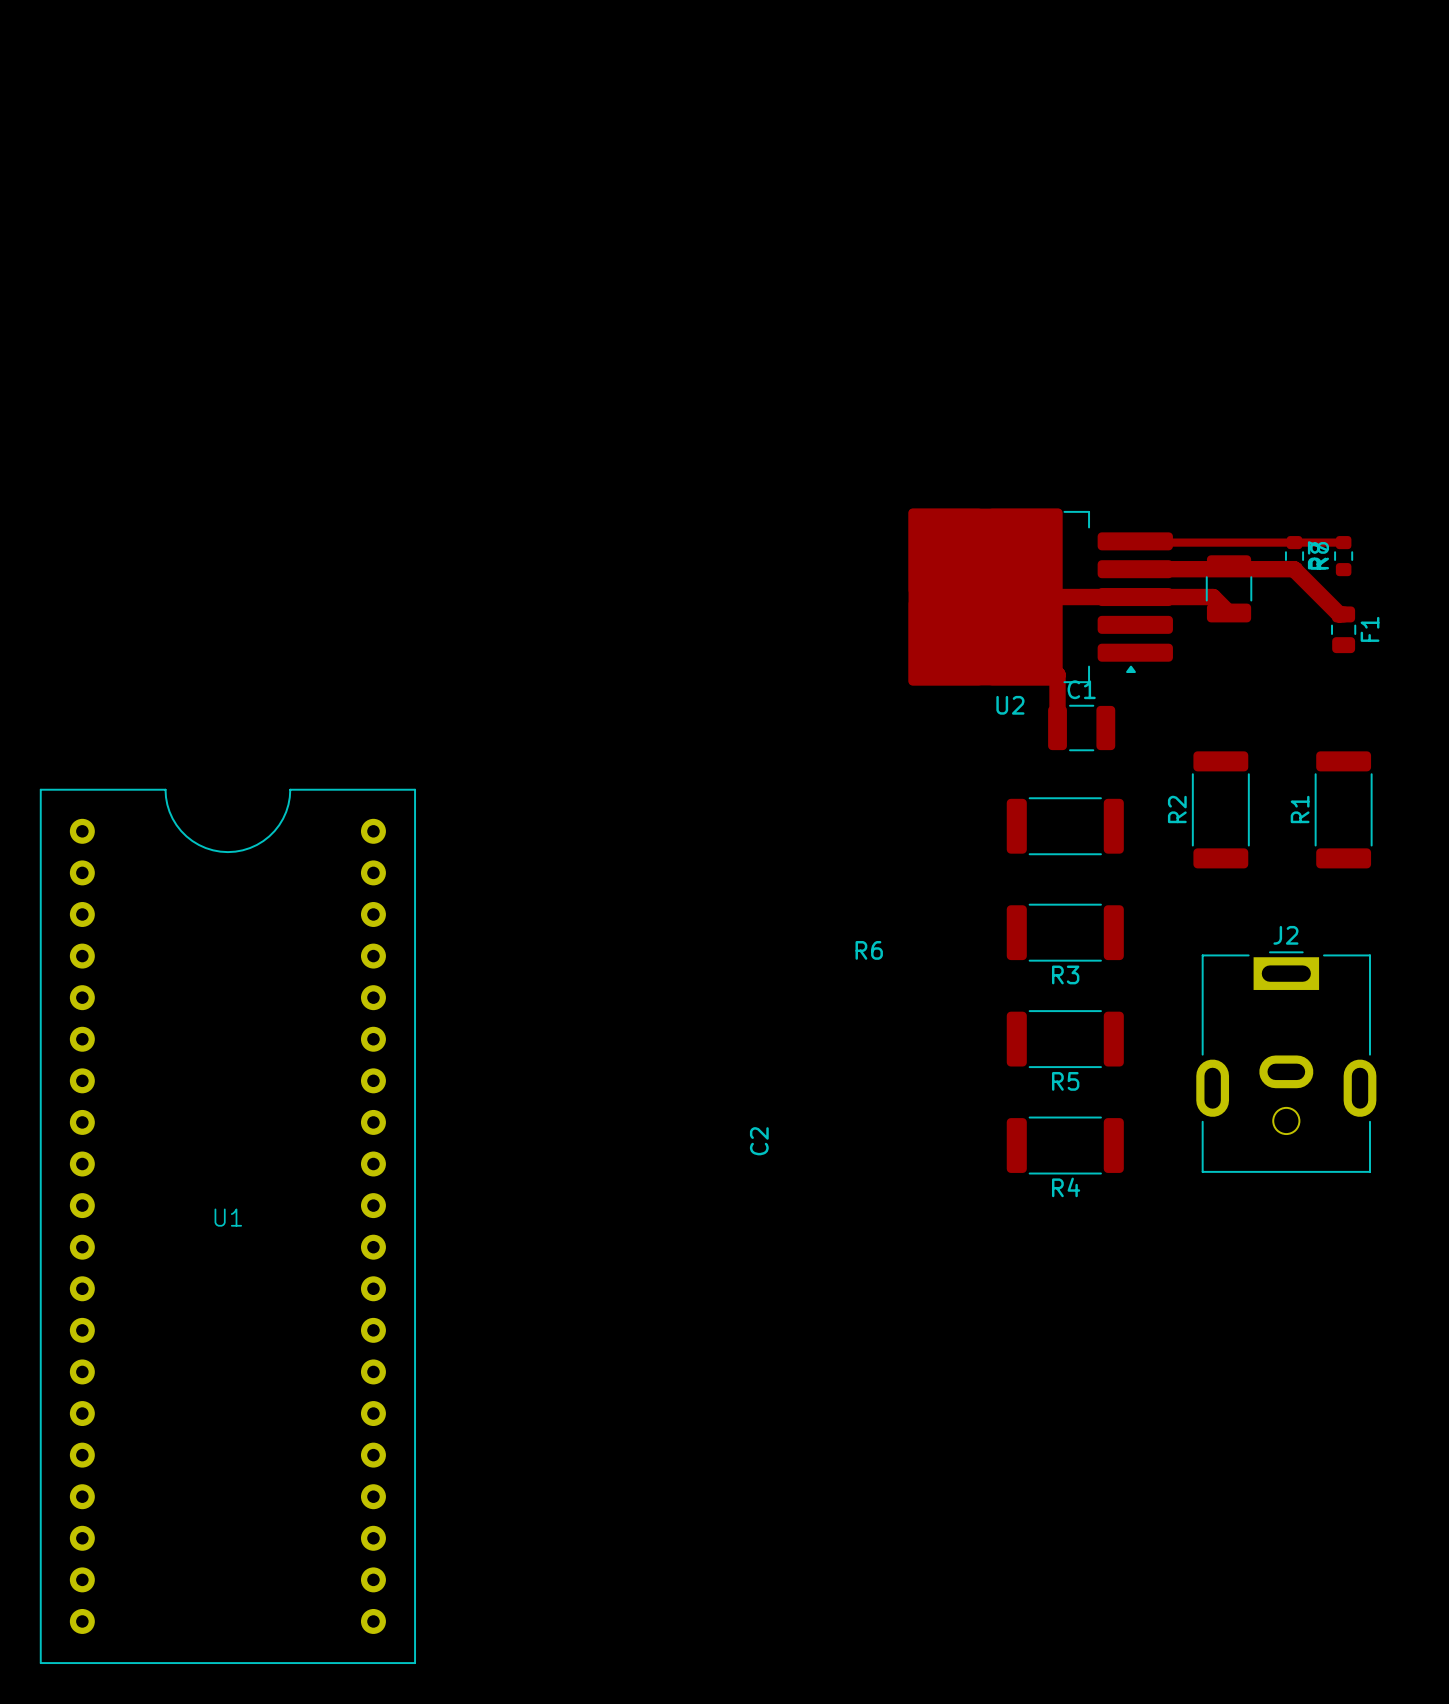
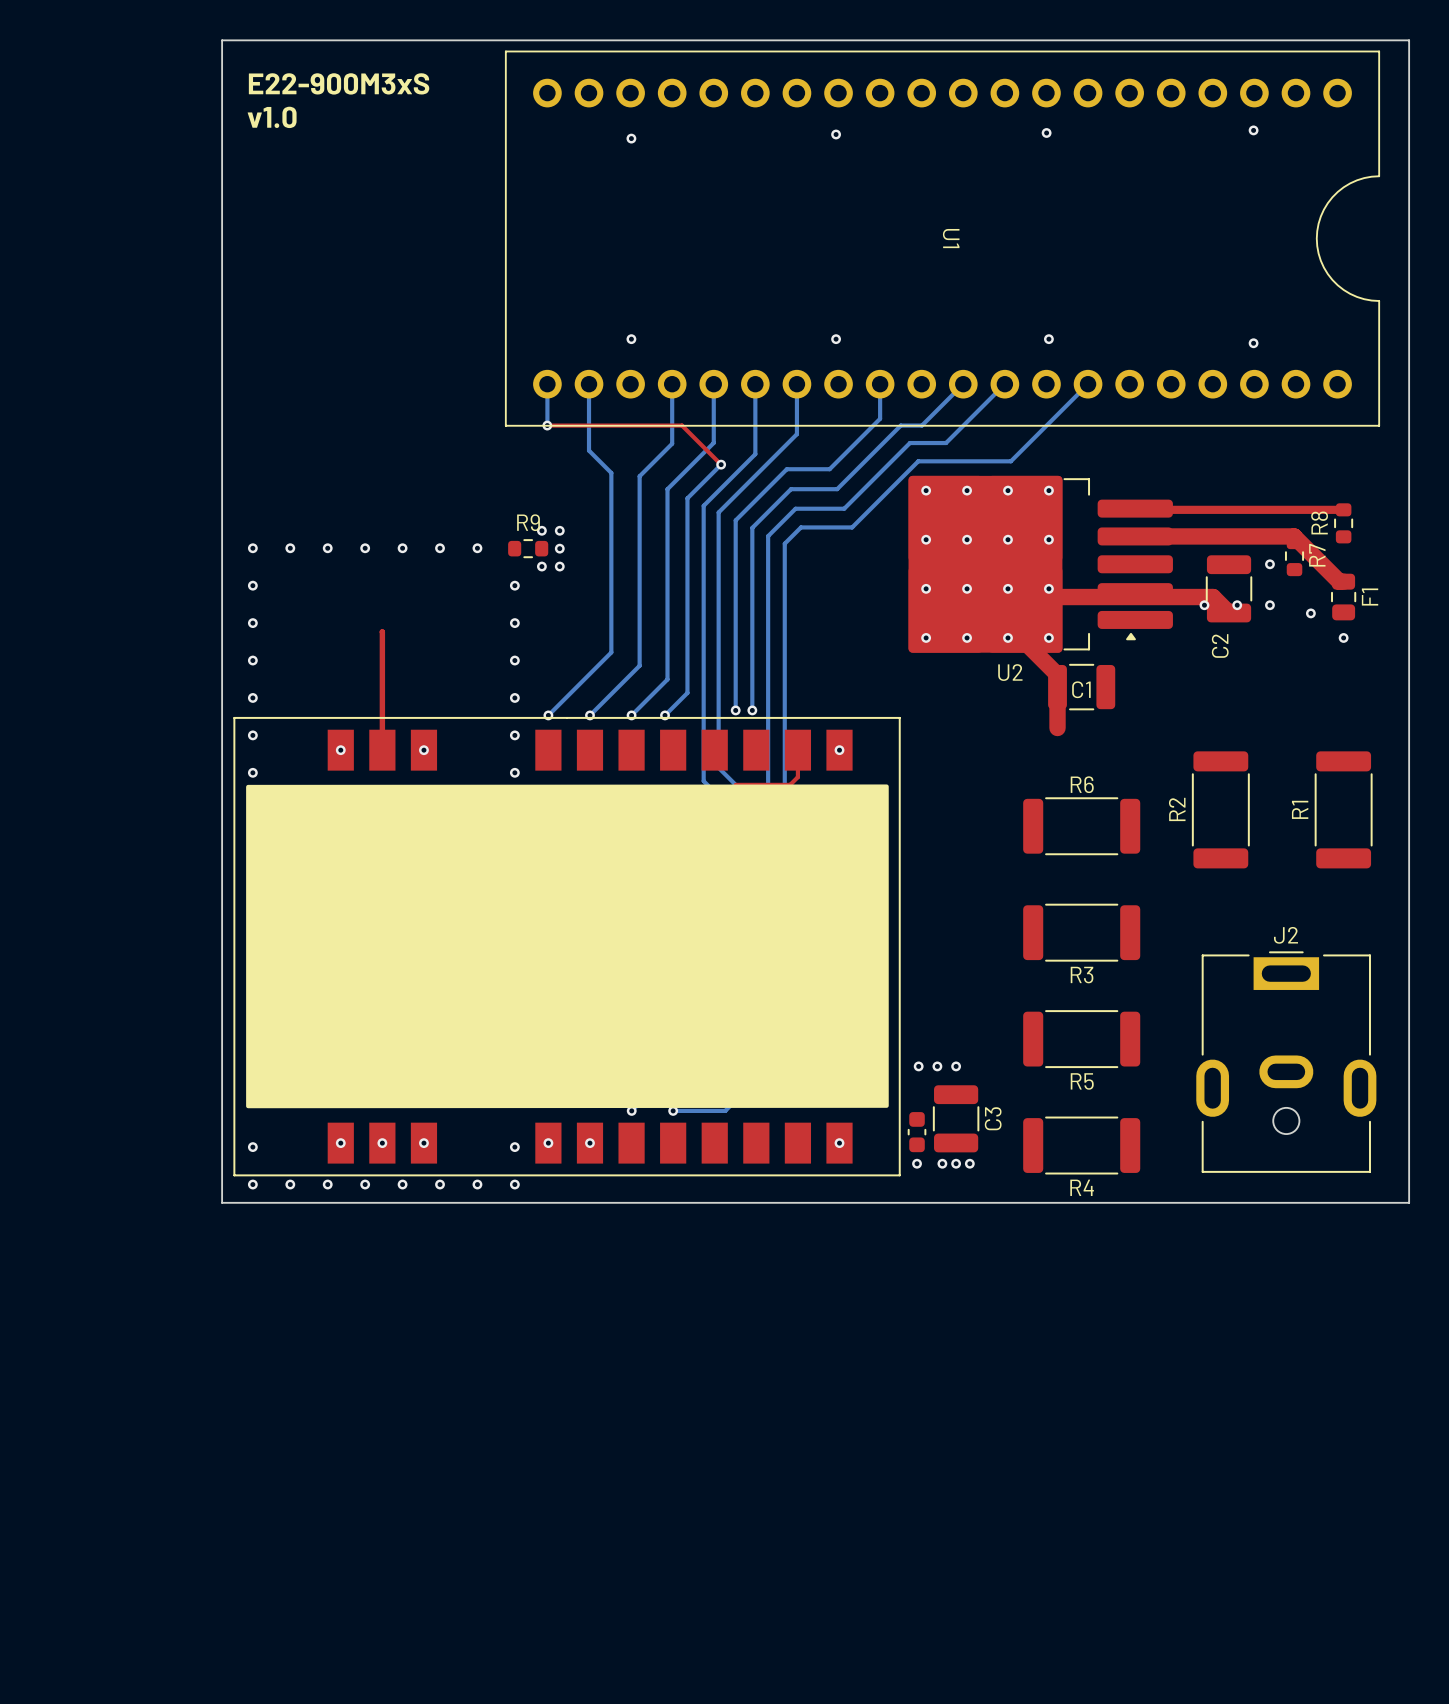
board edge: none -> (222, 40) (222, 1202) (1409, 1202) (1409, 40) (222, 40)
text: none -> E22-900M3xS (339, 83)
text: none -> v1.0 (272, 117)
via: none -> (1253, 130)
via: none -> (1046, 132)
via: none -> (836, 134)
via: none -> (631, 138)
via: none -> (631, 339)
via: none -> (836, 339)
via: none -> (1048, 339)
via: none -> (1253, 343)
bottom track: none -> (547, 384) (547, 425)
bottom track: none -> (589, 384) (589, 450) (611, 472) (611, 652) (548, 715)
bottom track: none -> (672, 384) (672, 443) (639, 476) (639, 665) (589, 715)
bottom track: none -> (713, 384) (713, 442) (667, 489) (667, 679) (631, 715)
bottom track: none -> (755, 384) (755, 454) (703, 505) (703, 781) (749, 826) (749, 1030) (703, 1076)
bottom track: none -> (796, 384) (796, 434) (718, 512) (718, 767) (735, 784)
bottom track: none -> (880, 384) (880, 418) (829, 469) (786, 469) (735, 520) (735, 710)
bottom track: none -> (963, 384) (921, 425) (900, 425) (837, 489) (791, 489) (752, 527) (752, 710)
bottom track: none -> (1004, 384) (946, 443) (909, 443) (844, 508) (795, 508) (768, 536) (768, 1040) (714, 1094) (647, 1094) (631, 1110)
bottom track: none -> (1088, 384) (1010, 461) (918, 461) (852, 527) (800, 527) (784, 543) (784, 1051) (725, 1110) (673, 1110)
top track: none -> (547, 425) (682, 425) (721, 464)
via: none -> (547, 425)
bottom track: none -> (721, 464) (687, 498) (687, 692) (665, 715)
via: none -> (721, 464)
via: none -> (926, 490)
via: none -> (967, 490)
via: none -> (1007, 490)
via: none -> (1048, 490)
via: none -> (541, 530)
via: none -> (559, 530)
via: none -> (926, 539)
via: none -> (967, 539)
via: none -> (1007, 539)
via: none -> (1048, 539)
top track: (1135, 541) (1343, 542) -> (1135, 508) (1343, 509)
via: none -> (252, 548)
via: none -> (290, 548)
via: none -> (327, 548)
via: none -> (365, 548)
via: none -> (402, 548)
via: none -> (440, 548)
via: none -> (477, 548)
R9: none -> (528, 548)
via: none -> (559, 548)
R8 position: (1343, 556) -> (1343, 523)
via: none -> (1269, 564)
via: none -> (541, 566)
via: none -> (559, 566)
top track: (1135, 569) (1294, 569) (1339, 614) (1343, 614) -> (1135, 536) (1294, 536) (1339, 581) (1343, 581)
via: none -> (252, 585)
via: none -> (514, 585)
via: none -> (926, 588)
via: none -> (967, 588)
via: none -> (1007, 588)
via: none -> (1048, 588)
U2 position: (1040, 597) -> (1040, 564)
via: none -> (1204, 605)
via: none -> (1237, 605)
via: none -> (1269, 605)
via: none -> (1310, 613)
via: none -> (252, 623)
via: none -> (514, 623)
F1 position: (1343, 629) -> (1343, 597)
top track: none -> (382, 631) (382, 750)
via: none -> (926, 637)
via: none -> (967, 637)
via: none -> (1007, 637)
via: none -> (1048, 637)
via: none -> (1343, 637)
via: none -> (252, 660)
via: none -> (514, 660)
via: none -> (252, 697)
via: none -> (514, 697)
via: none -> (735, 710)
via: none -> (752, 710)
via: none -> (548, 715)
via: none -> (589, 715)
via: none -> (631, 715)
via: none -> (665, 715)
C1 position: (1081, 728) -> (1081, 687)
via: none -> (252, 735)
via: none -> (514, 735)
via: none -> (340, 750)
via: none -> (423, 750)
top track: none -> (797, 750) (797, 777) (790, 784) (735, 784)
via: none -> (839, 750)
via: none -> (252, 772)
via: none -> (514, 772)
drawing: none -> [246, 784, 889, 1109]
U1 footprint: [39, 788, 416, 1664] -> [505, 50, 1380, 427]
R6 position: (1065, 826) -> (1081, 826)
R3 position: (1065, 932) -> (1081, 932)
part: none -> (567, 946)
R6 name position: R6 (869, 950) -> R6 (1082, 784)
R5 position: (1065, 1039) -> (1081, 1039)
via: none -> (918, 1066)
via: none -> (937, 1066)
via: none -> (956, 1066)
via: none -> (631, 1110)
via: none -> (673, 1110)
C3: none -> (956, 1118)
part: none -> (917, 1132)
C2 name position: C2 (759, 1141) -> C2 (1220, 645)
via: none -> (340, 1143)
via: none -> (382, 1143)
via: none -> (423, 1143)
via: none -> (548, 1143)
via: none -> (589, 1143)
via: none -> (839, 1143)
R4 position: (1065, 1145) -> (1081, 1145)
via: none -> (252, 1147)
via: none -> (514, 1147)
via: none -> (917, 1163)
via: none -> (942, 1163)
via: none -> (956, 1163)
via: none -> (969, 1163)
via: none -> (252, 1184)
via: none -> (290, 1184)
via: none -> (327, 1184)
via: none -> (365, 1184)
via: none -> (402, 1184)
via: none -> (440, 1184)
via: none -> (477, 1184)
via: none -> (514, 1184)

